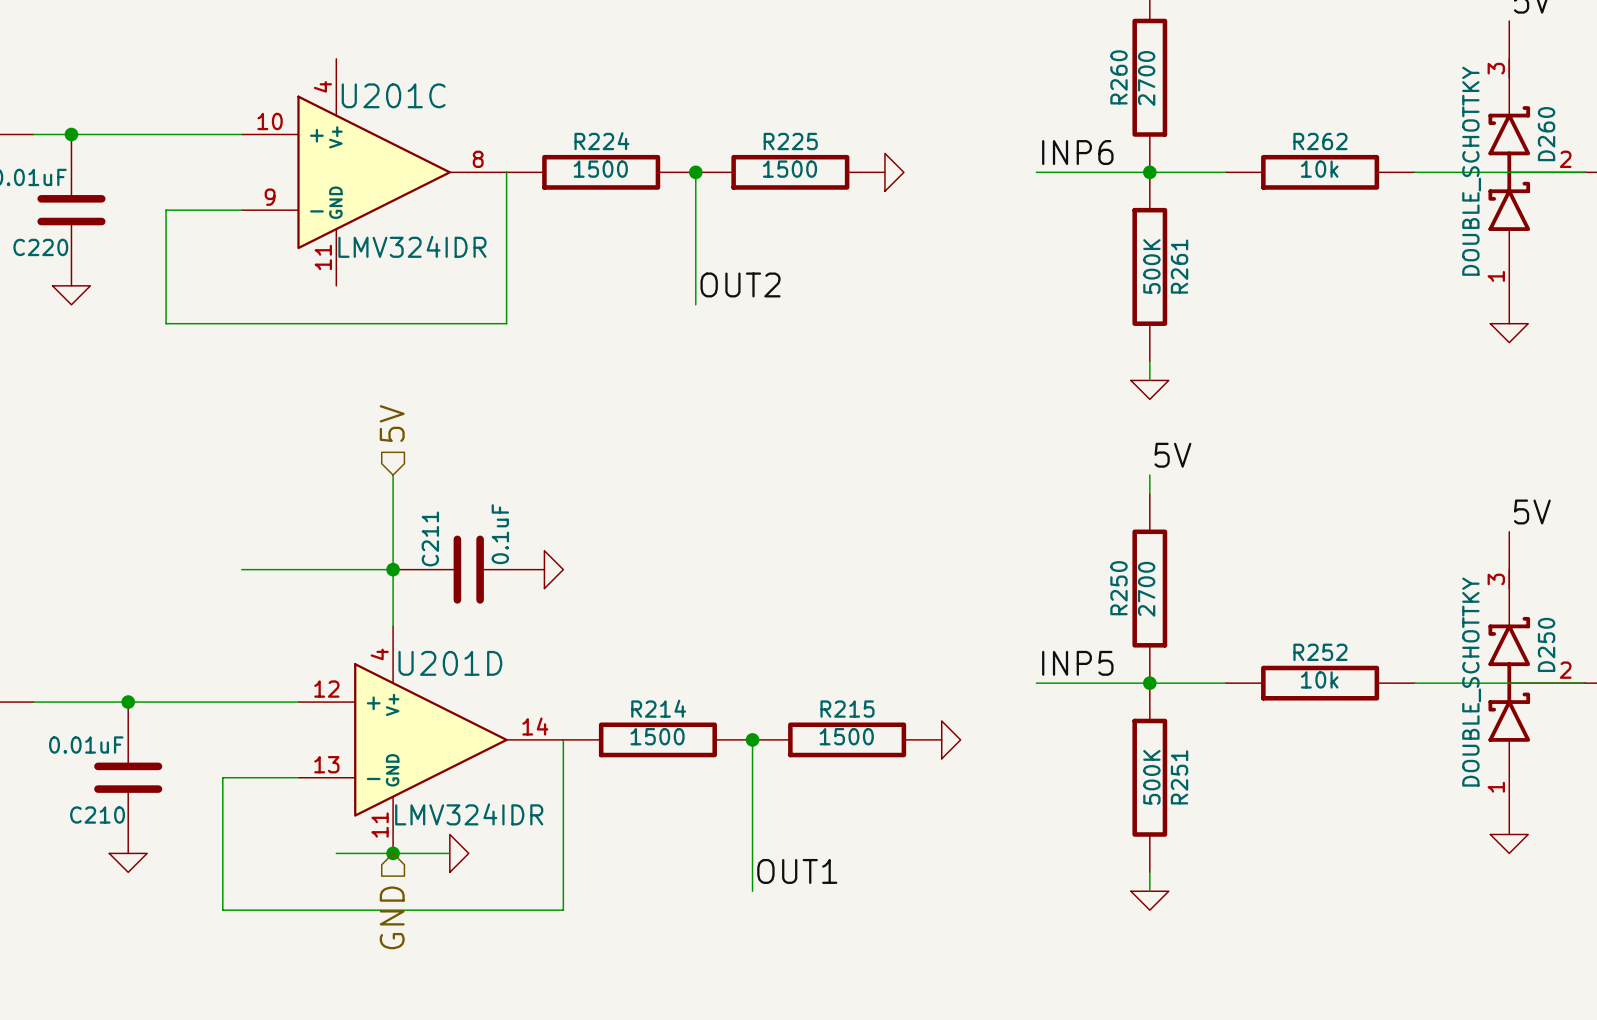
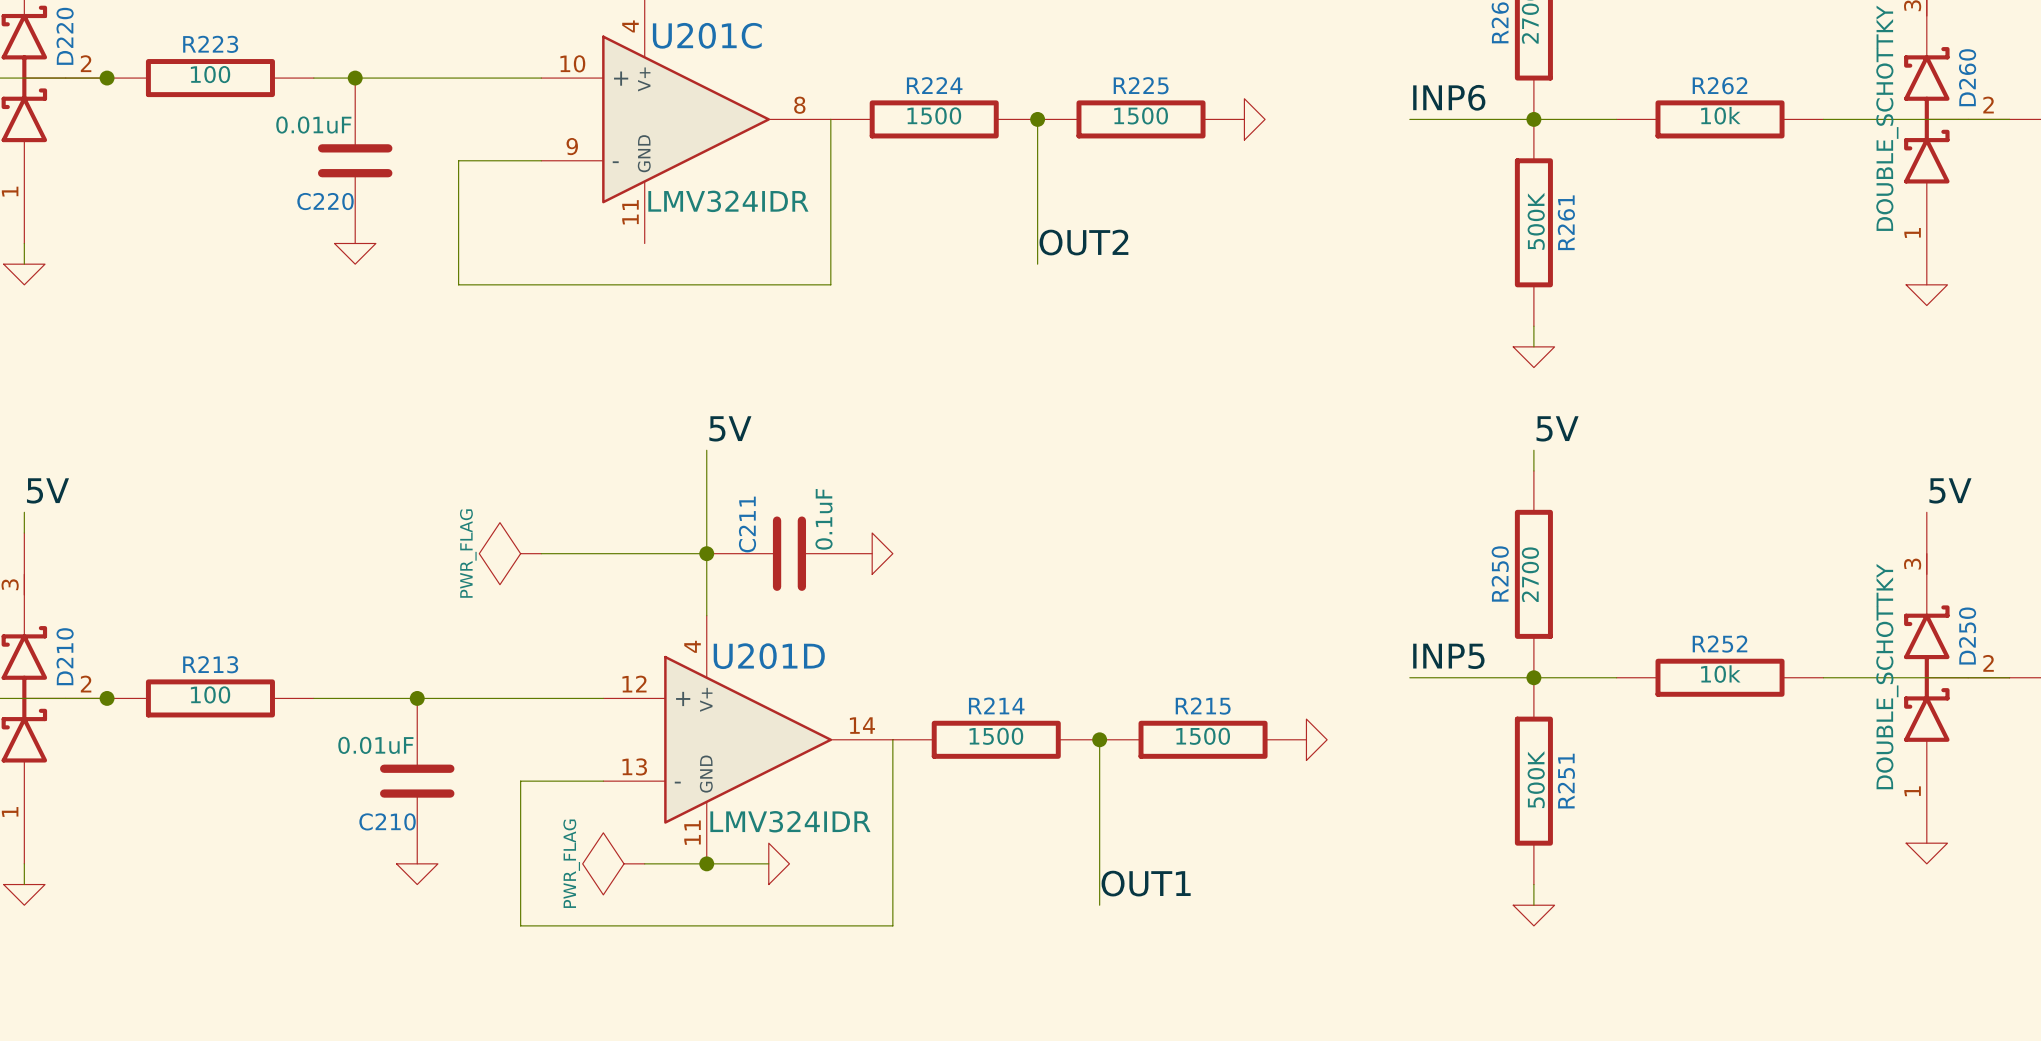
hierarchical label: 5V (392, 423) -> none
label: none -> 5V (730, 428)
power symbol: none -> PWR_FLAG (510, 553)
power symbol: none -> PWR_FLAG (613, 863)
hierarchical label: GND (392, 917) -> none

